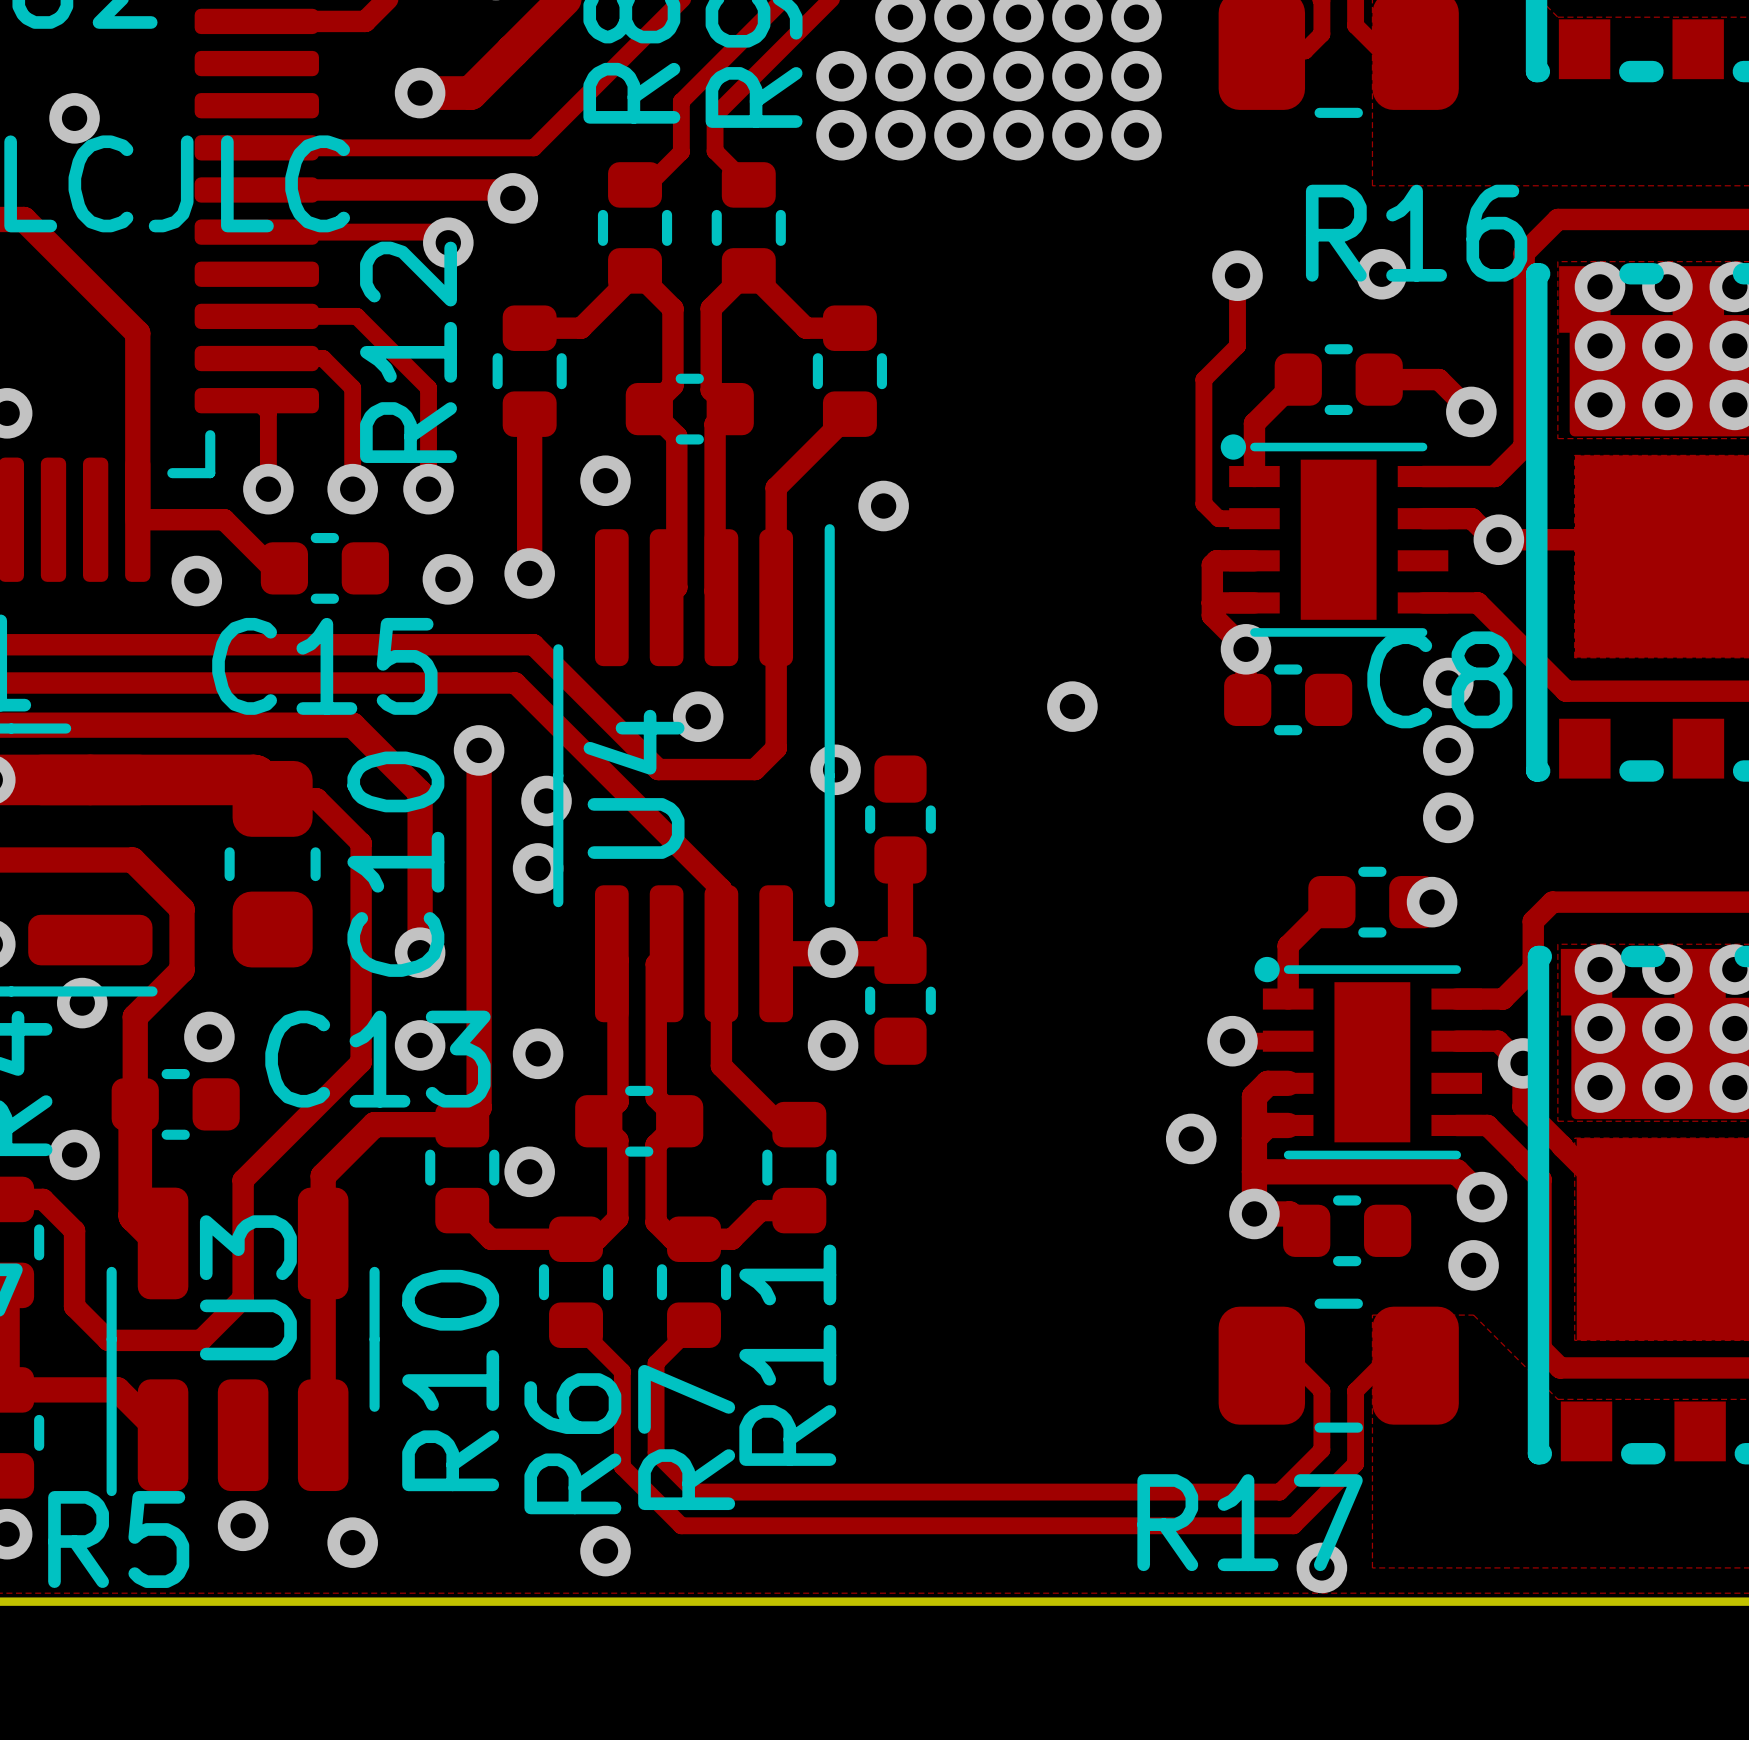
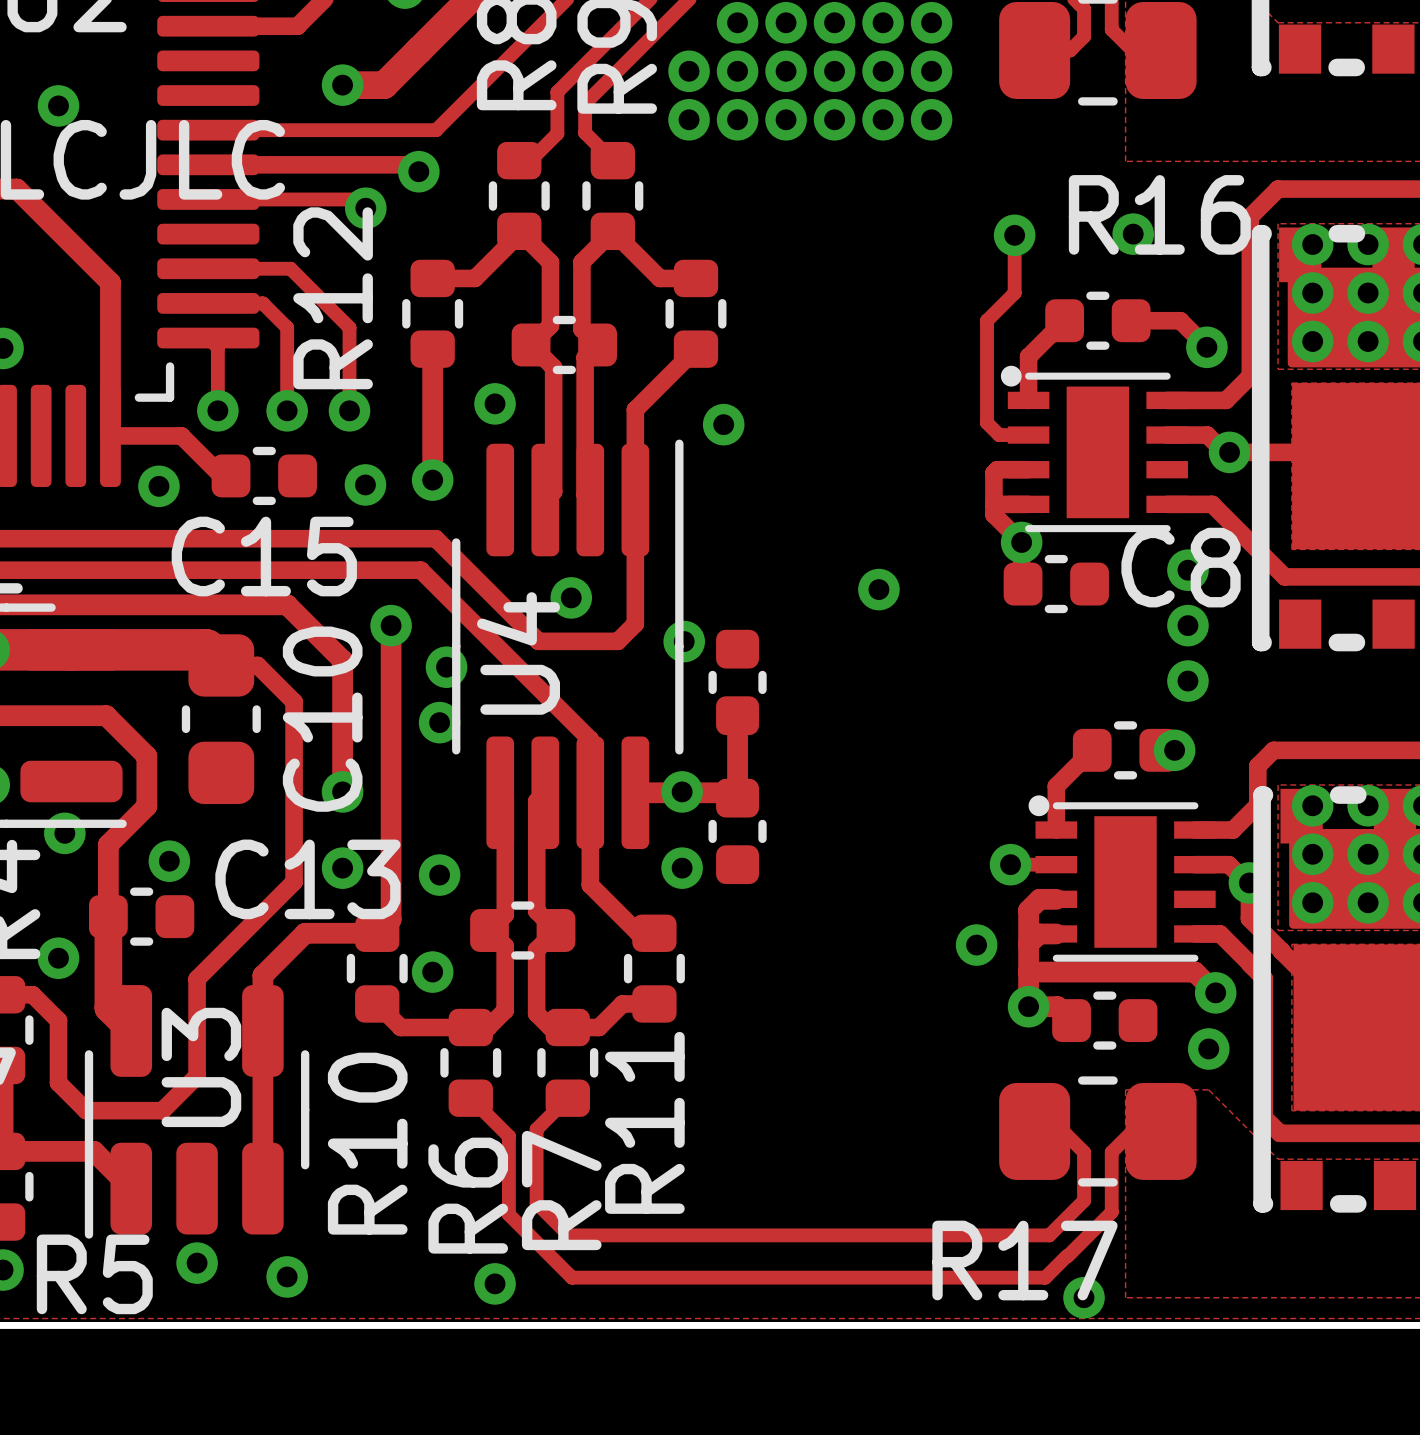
R16 name position: R16 (1416, 233) -> R16 (1159, 214)
track: (1302, 1517) (1293, 1525) (681, 1525) -> (1066, 1256) (1045, 1277) (571, 1277) (557, 1263)

